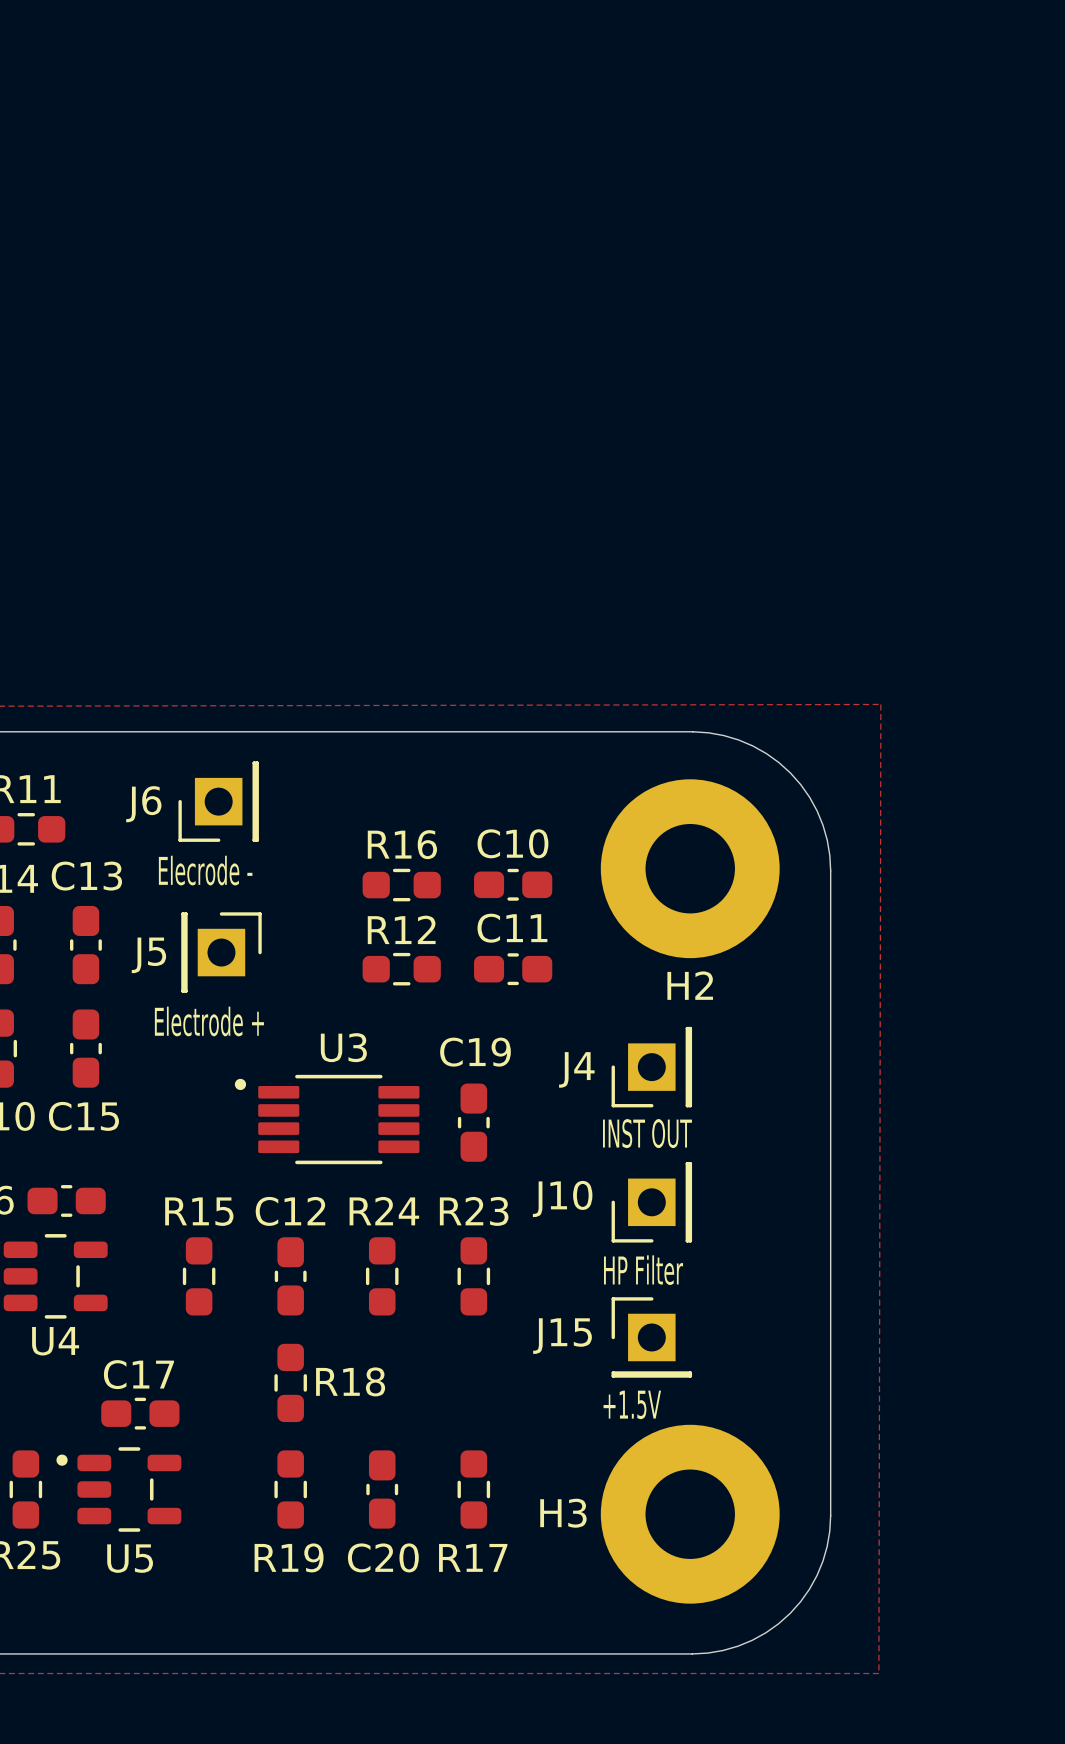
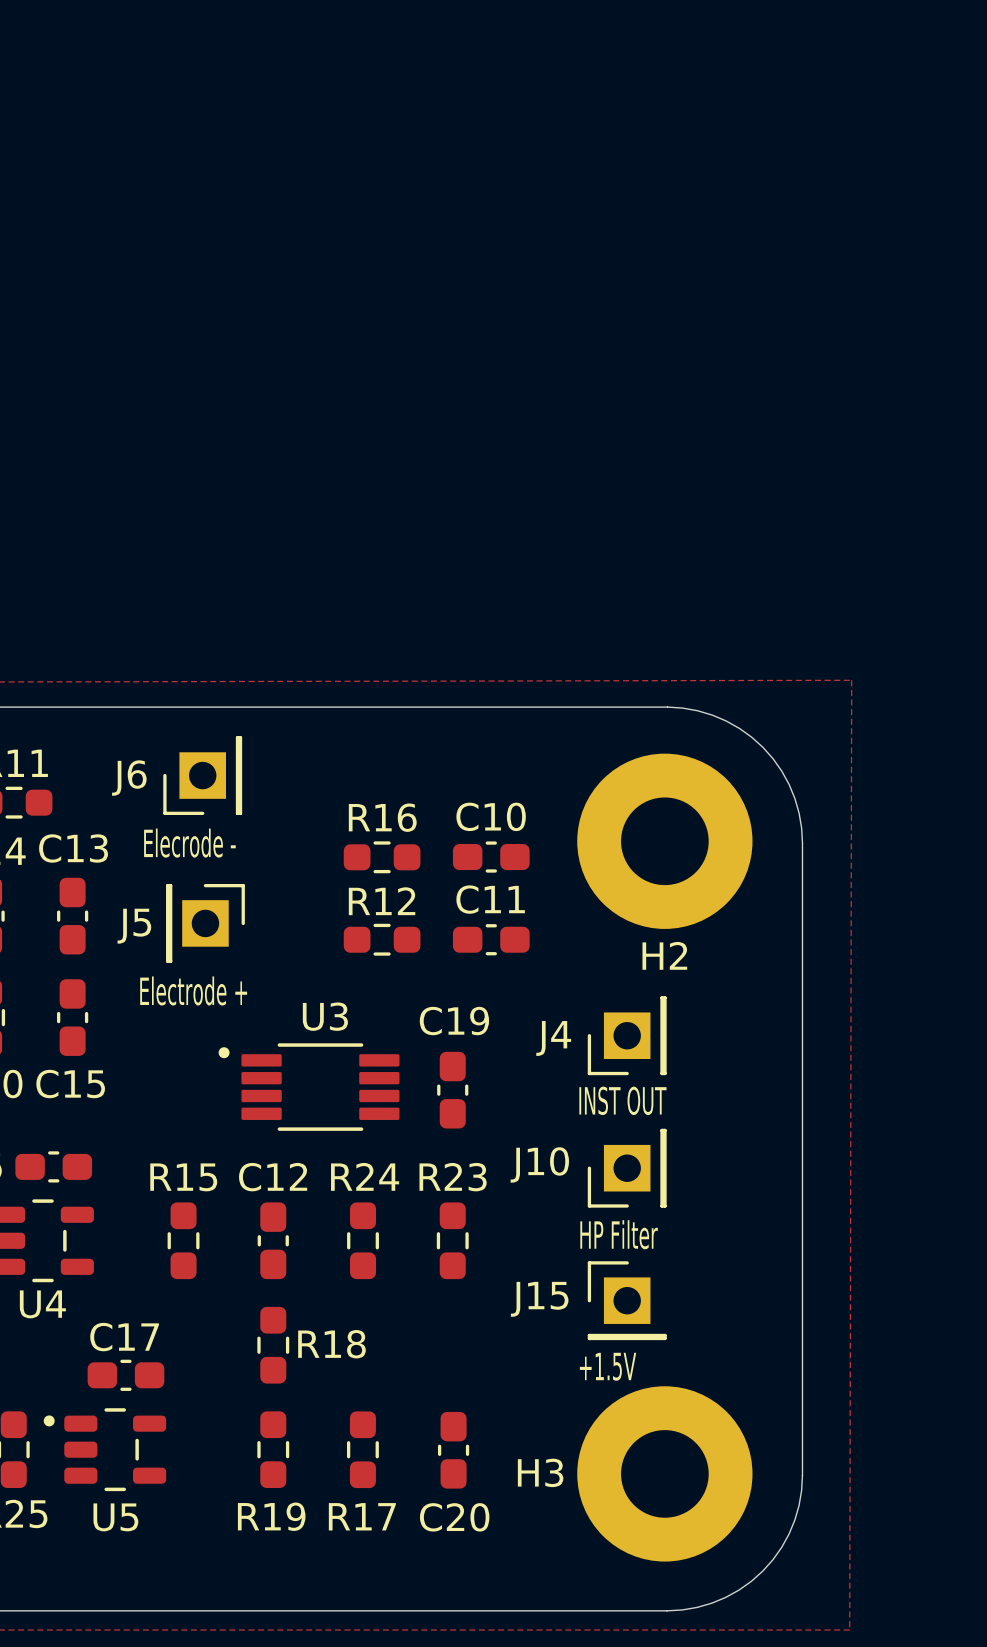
C20 position: (382, 1489) -> (453, 1450)
R17 position: (473, 1489) -> (362, 1449)

